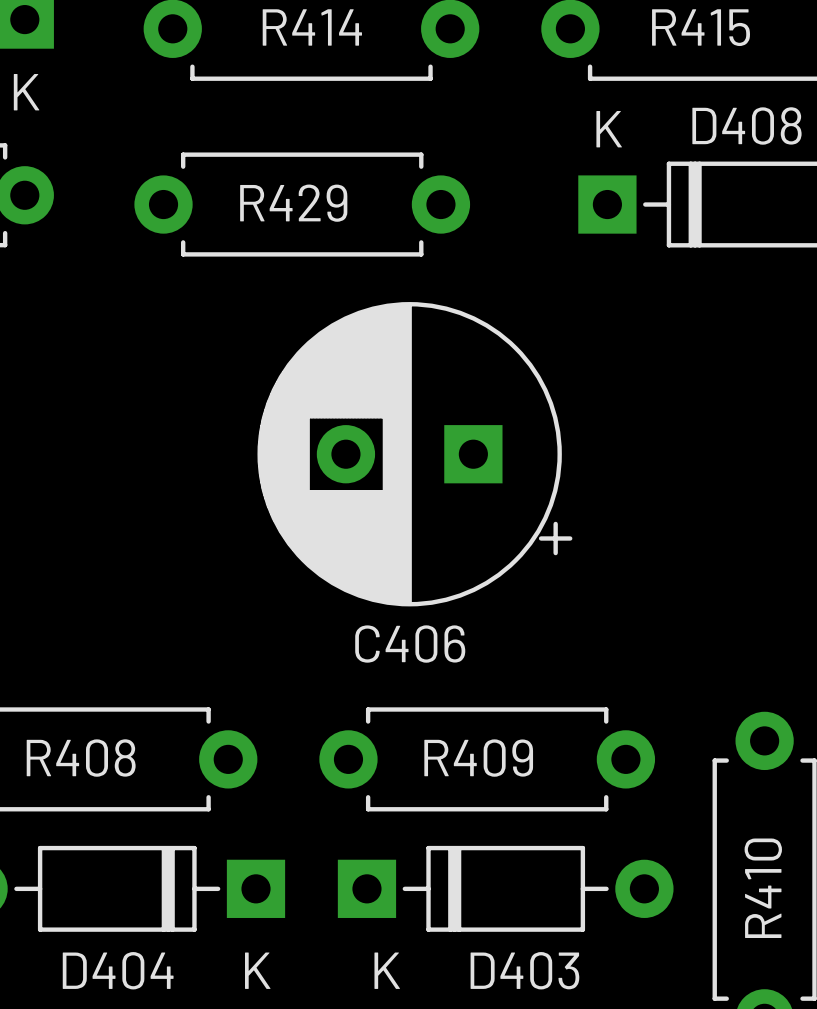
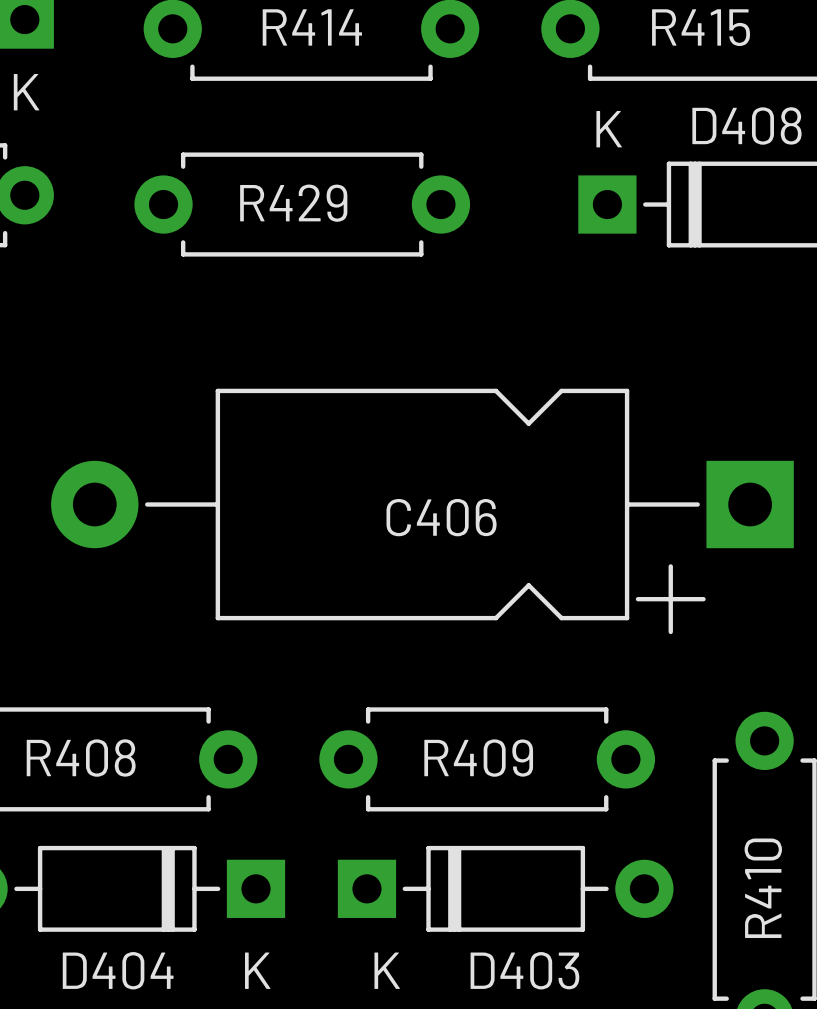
C406 footprint: [257, 302, 573, 607] -> [51, 388, 794, 635]
C406 name position: C406 (410, 644) -> C406 (441, 517)

